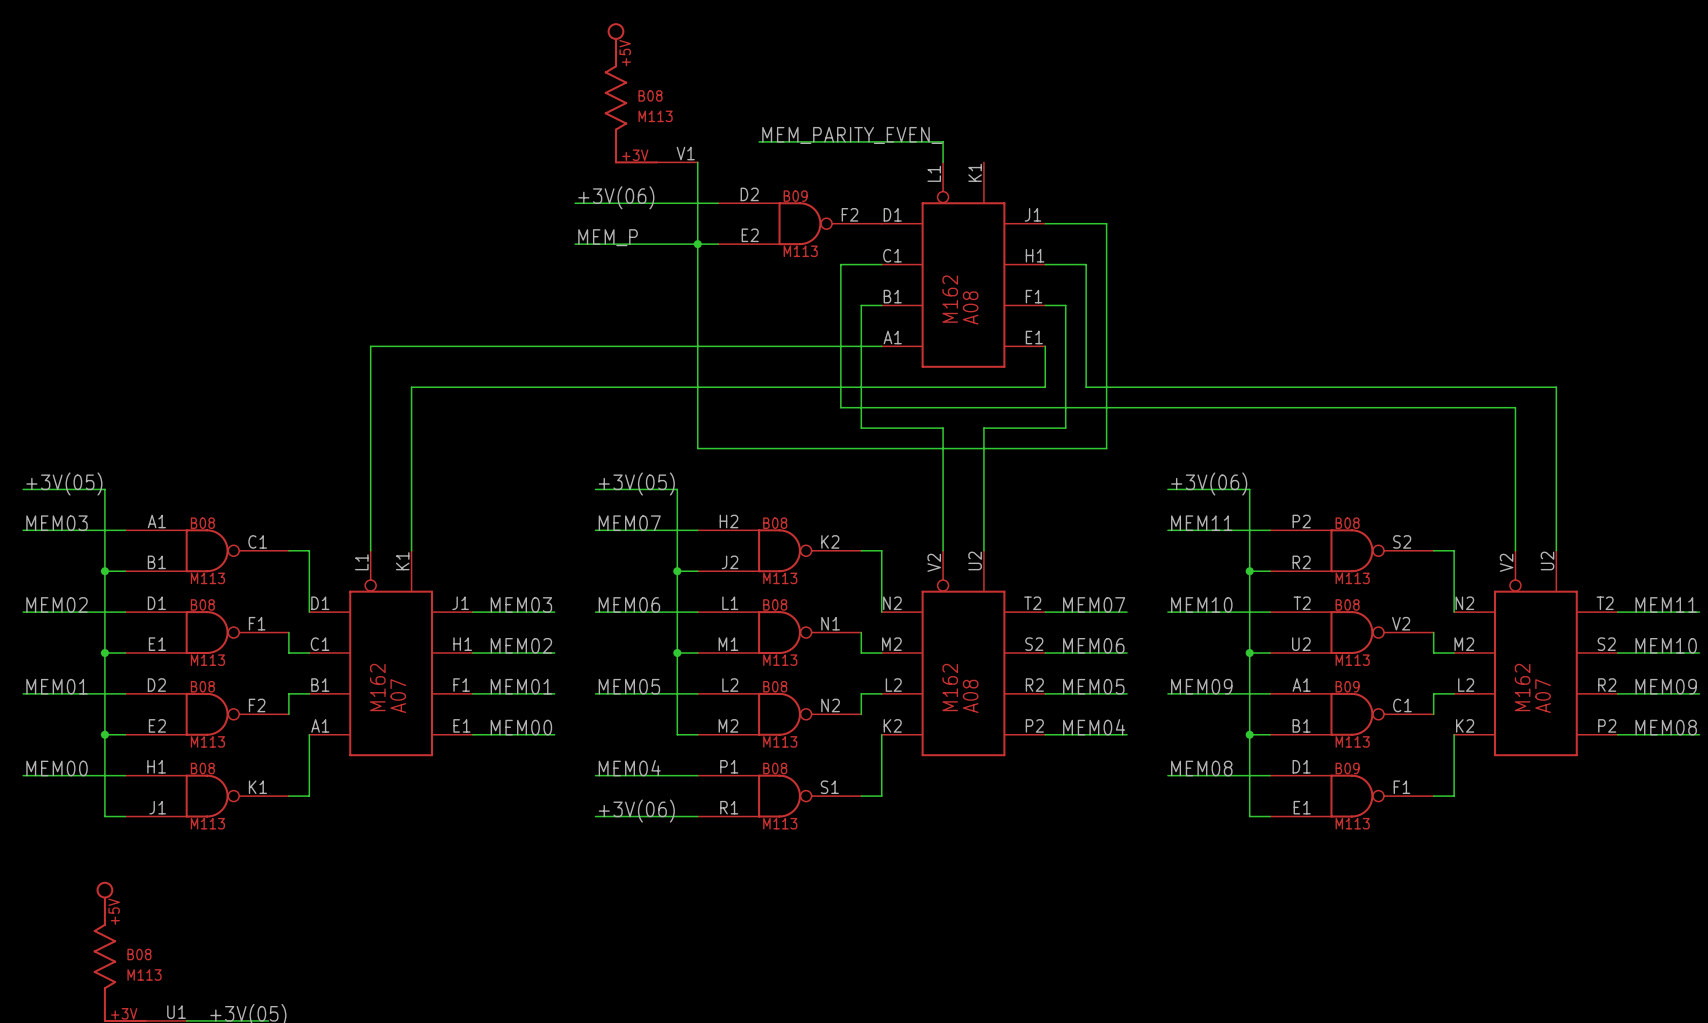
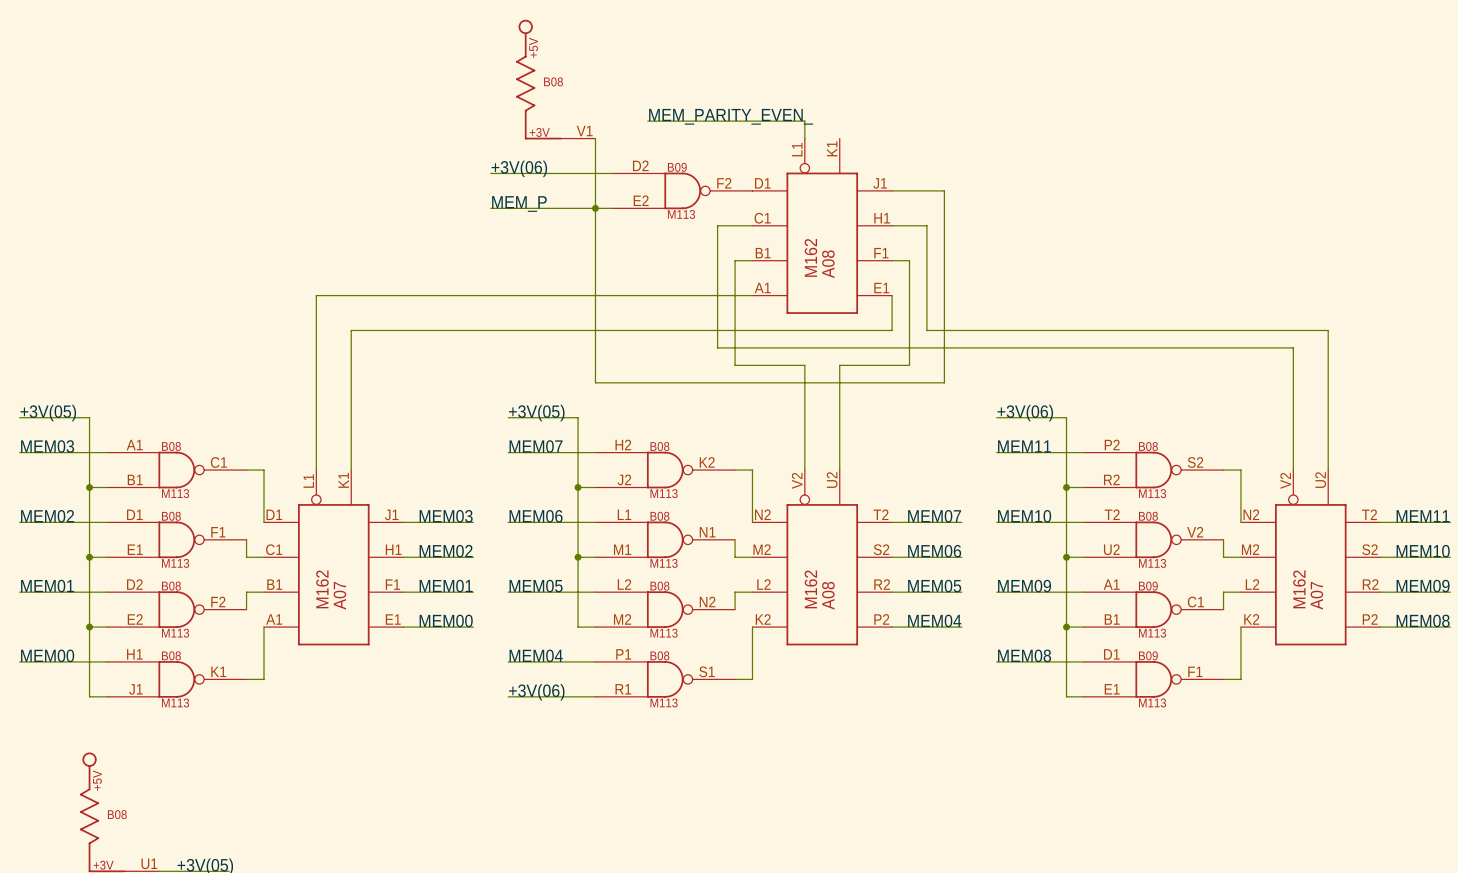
B08 value: M113 (655, 116) -> none
B08 value: M113 (144, 974) -> none

